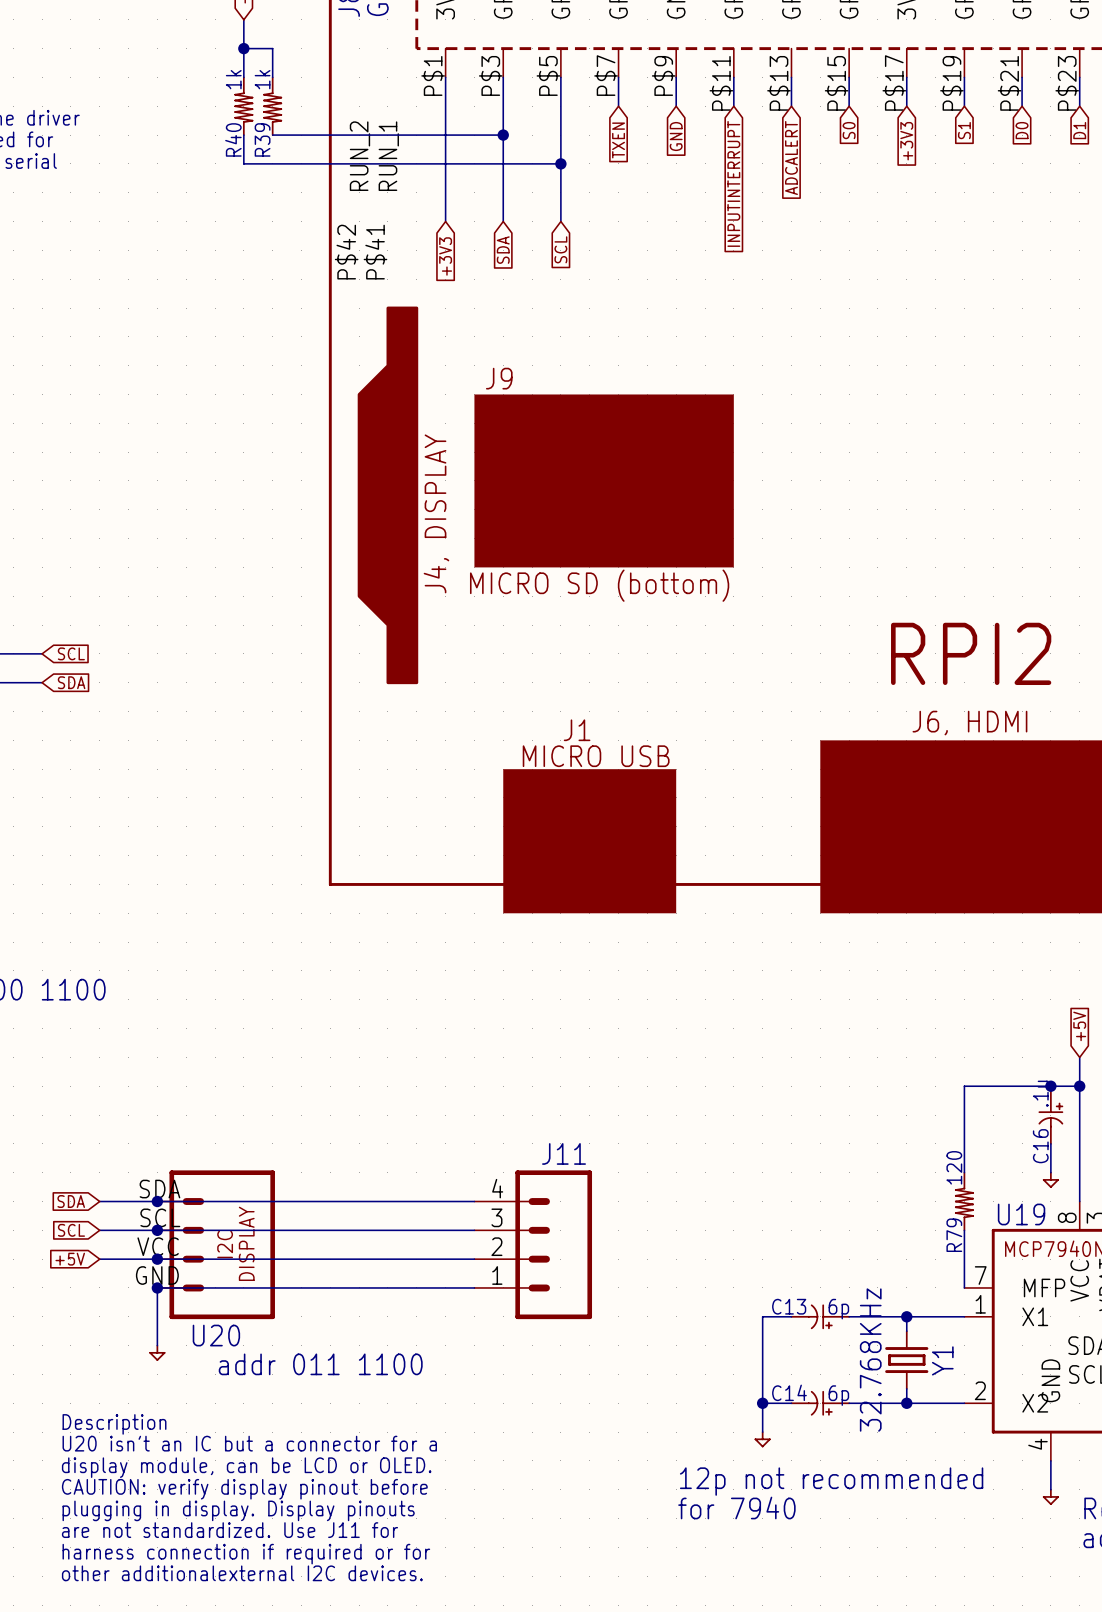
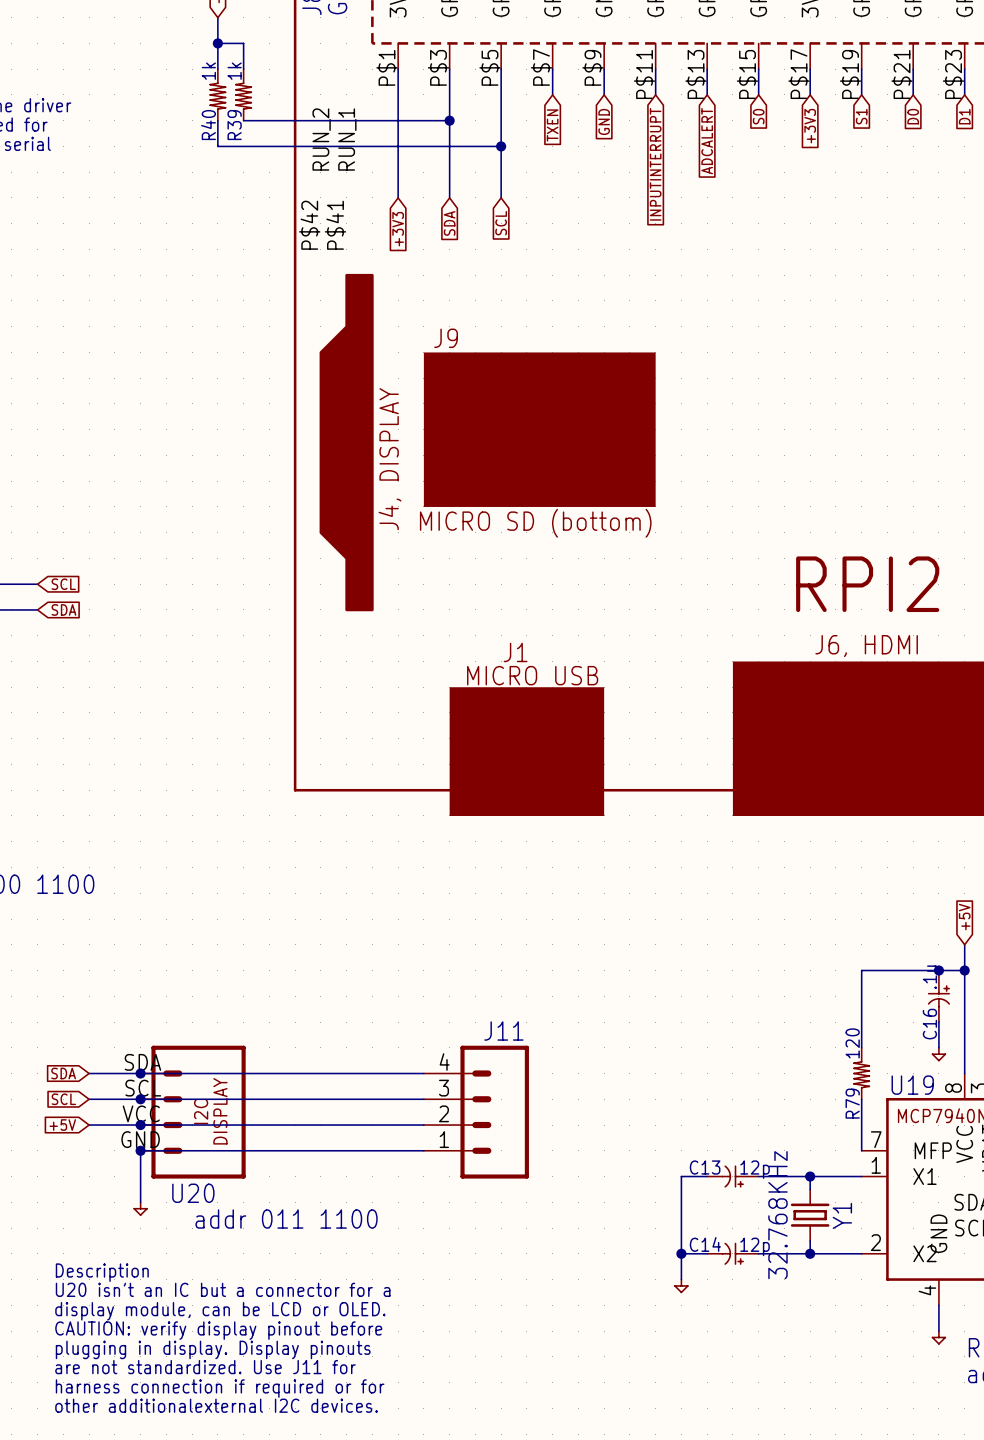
C13 value: 6p (838, 1309) -> 12p (755, 1169)
C14 value: 6p (838, 1395) -> 12p (755, 1246)
text: 12p not recommended (831, 1481) -> none
text: for 7940 (736, 1508) -> none

